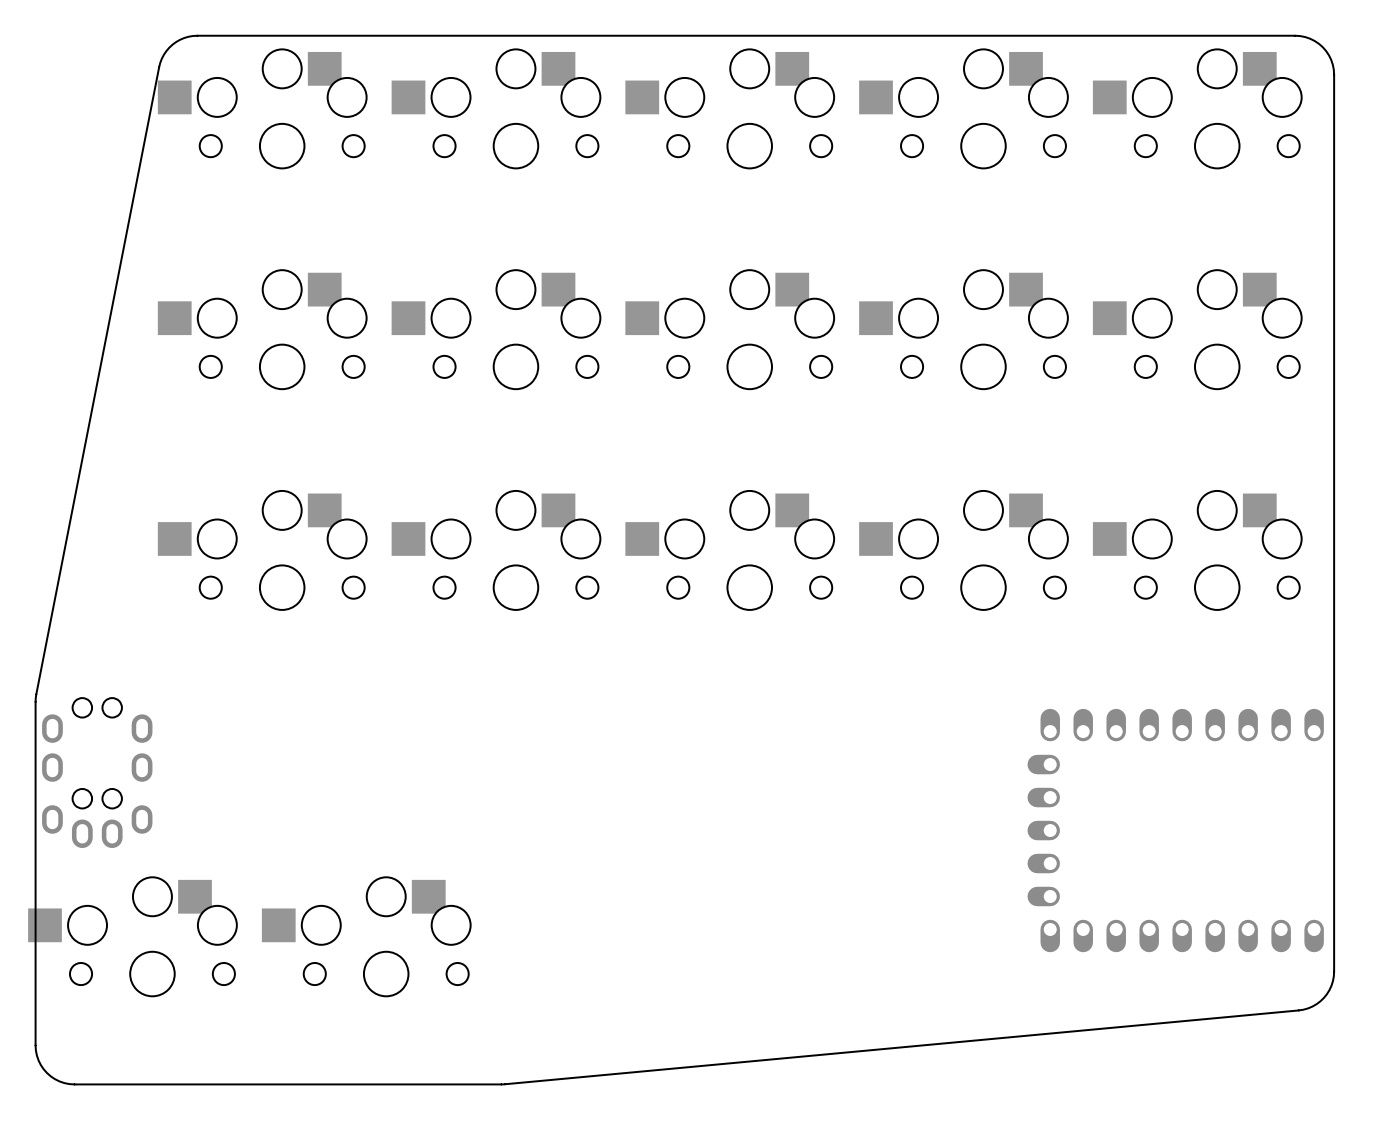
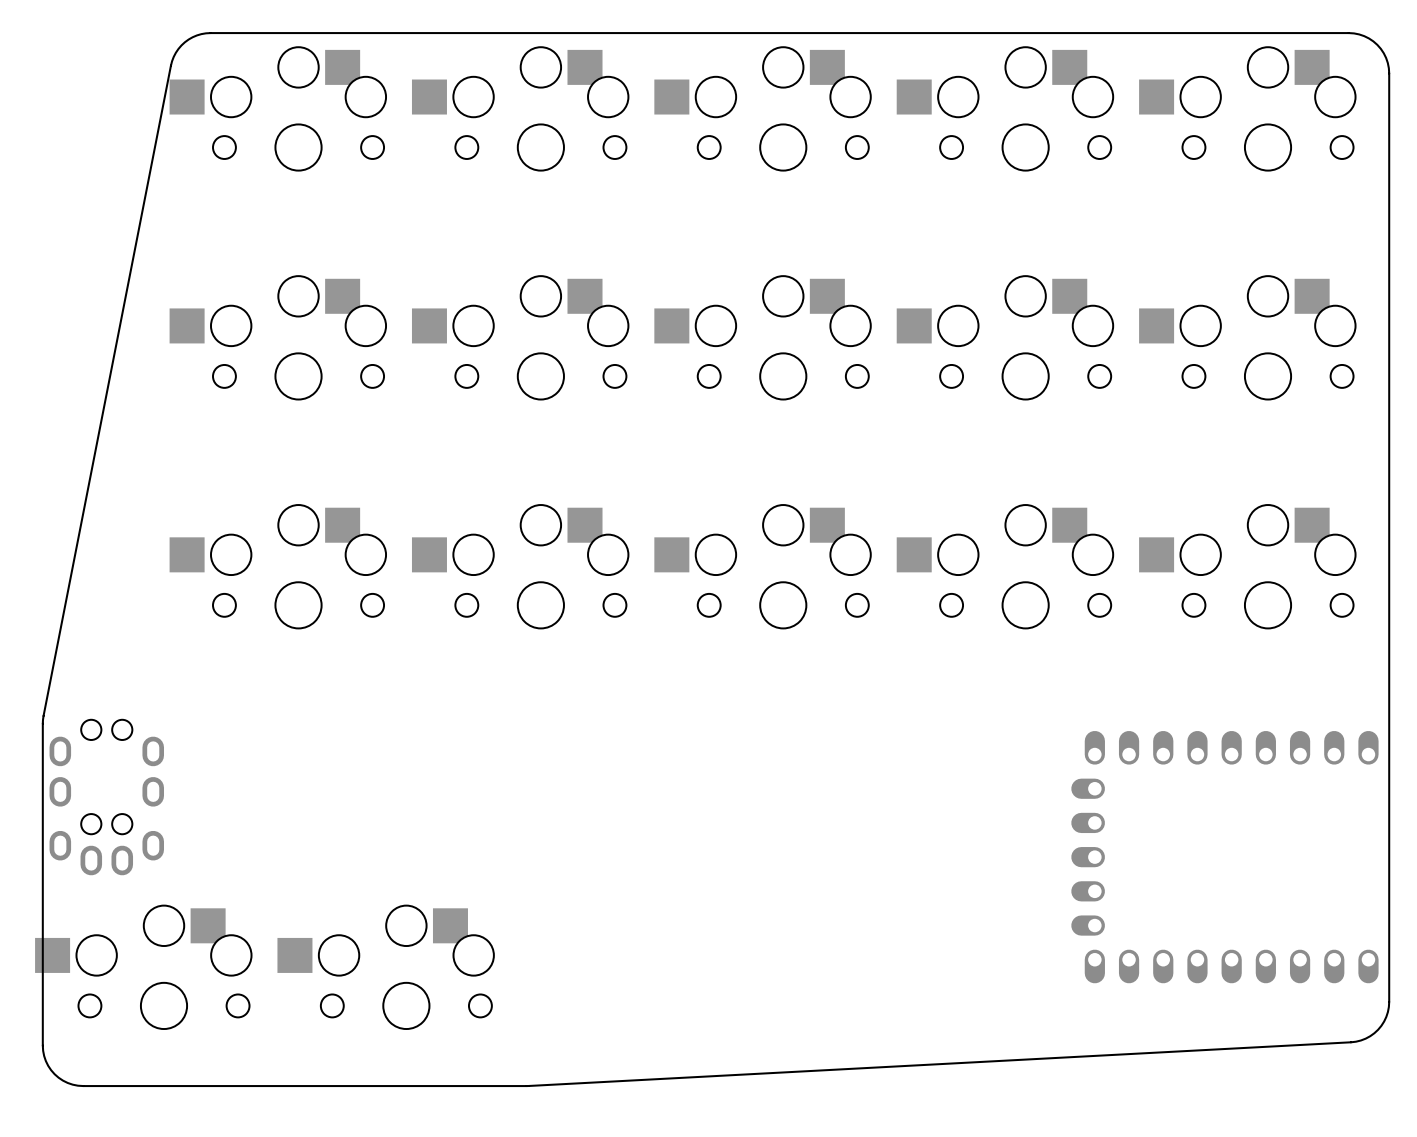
board edge: (1334, 970) (1331, 985) (1323, 997) (1312, 1006) (1298, 1010) (503, 1084) (69, 1084) (50, 1076) (38, 1060) (35, 1045) (35, 1012) -> (1389, 1001) (1386, 1016) (1378, 1029) (1365, 1038) (1350, 1042) (527, 1086) (77, 1085) (63, 1080) (51, 1070) (45, 1061) (42, 1045)

